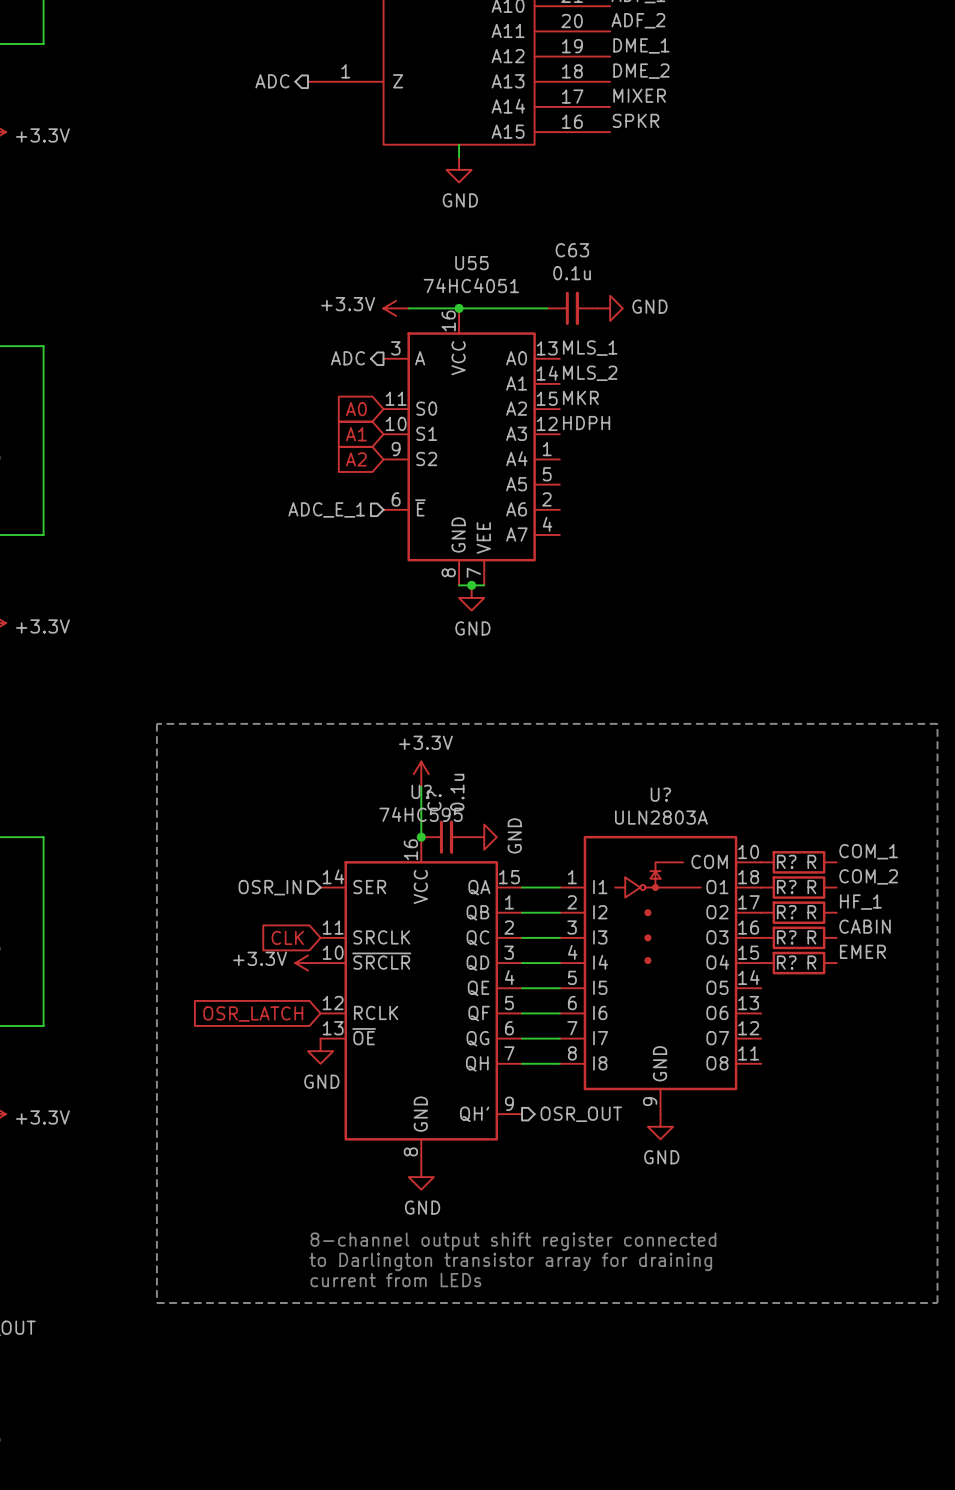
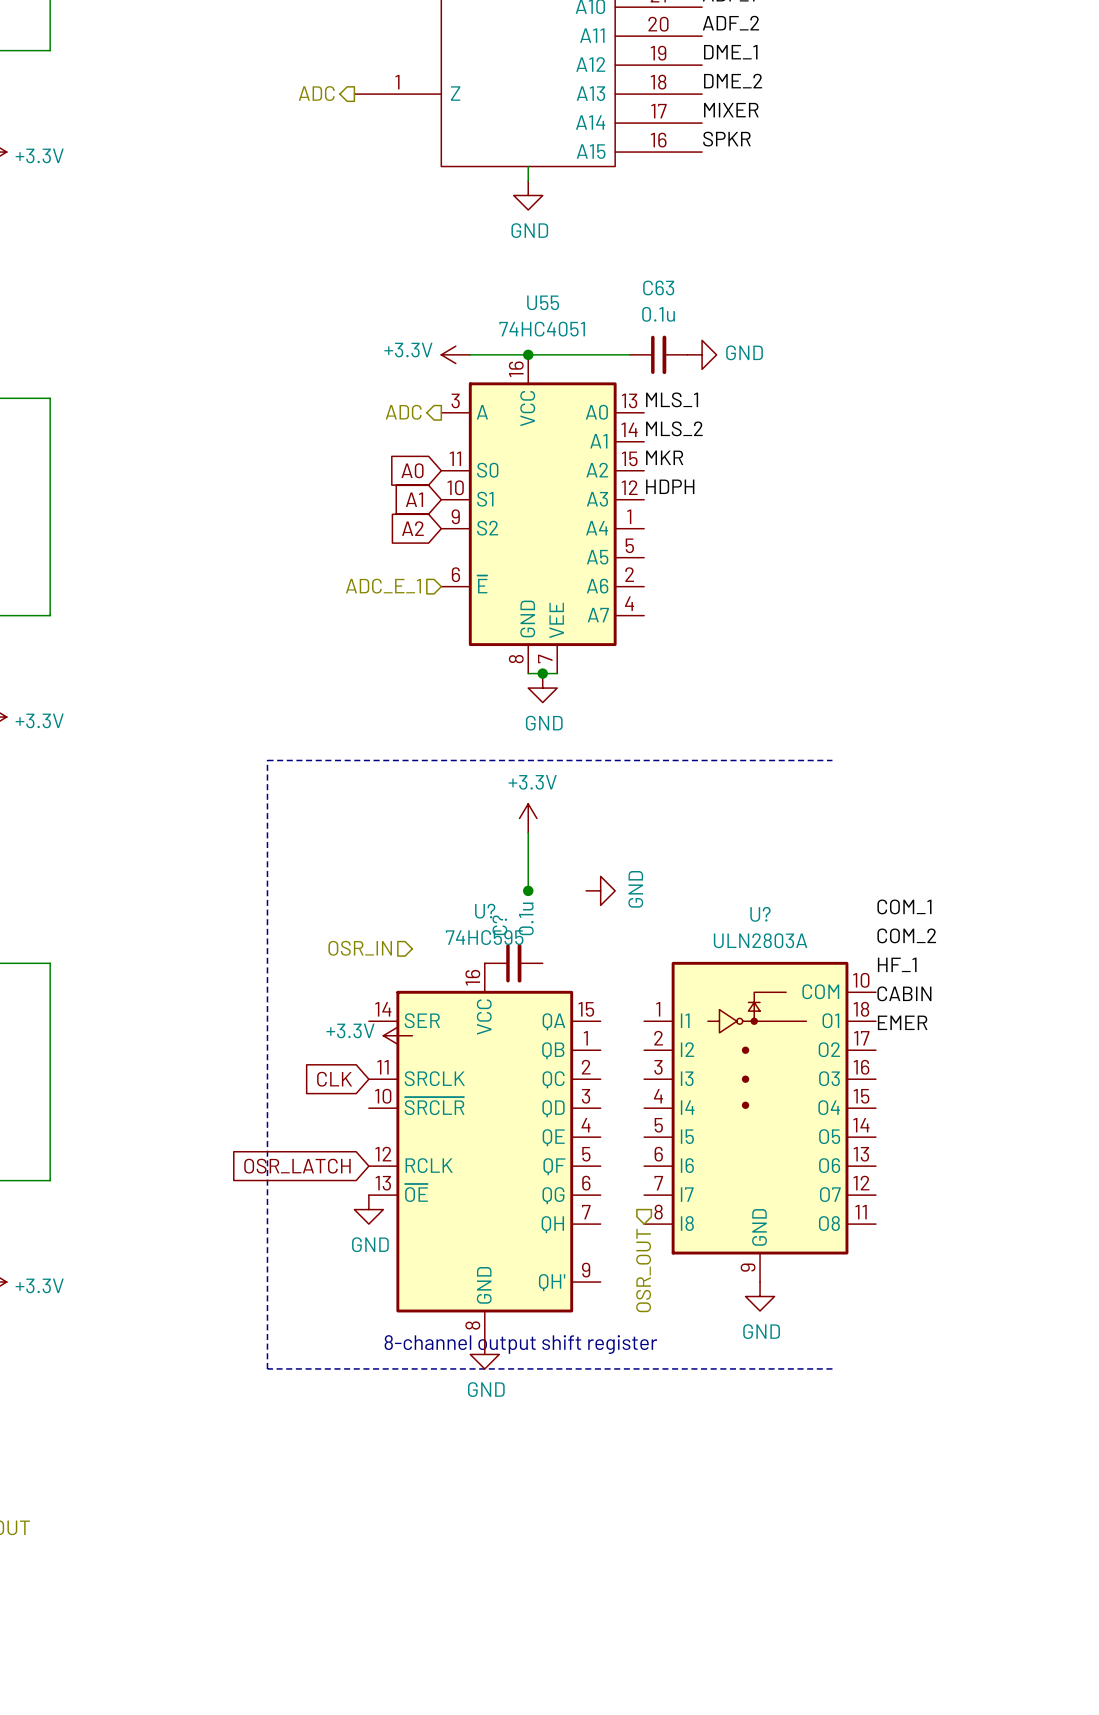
line: none -> (832, 760) (267, 760) (267, 1368) (832, 1368)
power symbol: none -> +3.3V (528, 818)
line: (156, 723) (156, 1303) (937, 1303) (937, 723) (156, 723) -> none
power symbol: +3.3V (421, 774) -> none
junction: none -> (528, 890)
wire: (421, 786) (421, 837) -> (528, 832) (528, 890)
junction: (421, 837) -> none
power symbol position: GND (484, 837) -> GND (600, 890)
label position: COM_1 (868, 851) -> COM_1 (904, 906)
R?: R (799, 862) -> none
label position: COM_2 (868, 876) -> COM_2 (906, 935)
hierarchical label position: OSR_IN (270, 887) -> OSR_IN (360, 948)
wire: (522, 887) (559, 887) -> none
R?: R (799, 887) -> none
power symbol: none -> +3.3V (397, 1035)
label position: HF_1 (860, 902) -> HF_1 (897, 964)
wire: (522, 912) (559, 912) -> none
R?: R (799, 912) -> none
label position: CABIN (865, 926) -> CABIN (904, 993)
wire: (522, 937) (559, 937) -> none
R?: R (799, 937) -> none
label position: EMER (862, 951) -> EMER (902, 1022)
power symbol: +3.3V (307, 963) -> none
wire: (522, 963) (559, 963) -> none
R?: R (799, 963) -> none
wire: (522, 988) (559, 988) -> none
wire: (522, 1013) (559, 1013) -> none
wire: (522, 1038) (559, 1038) -> none
wire: (522, 1063) (559, 1063) -> none
hierarchical label rotation: 0° (581, 1114) -> 90° clockwise (643, 1270)
text: none -> 8-channel output shift register (520, 1344)
text: 8-channel output shift register connected (513, 1241) -> none
text: to Darlington transistor array for draining (510, 1261) -> none
text: current from LEDs (395, 1280) -> none

